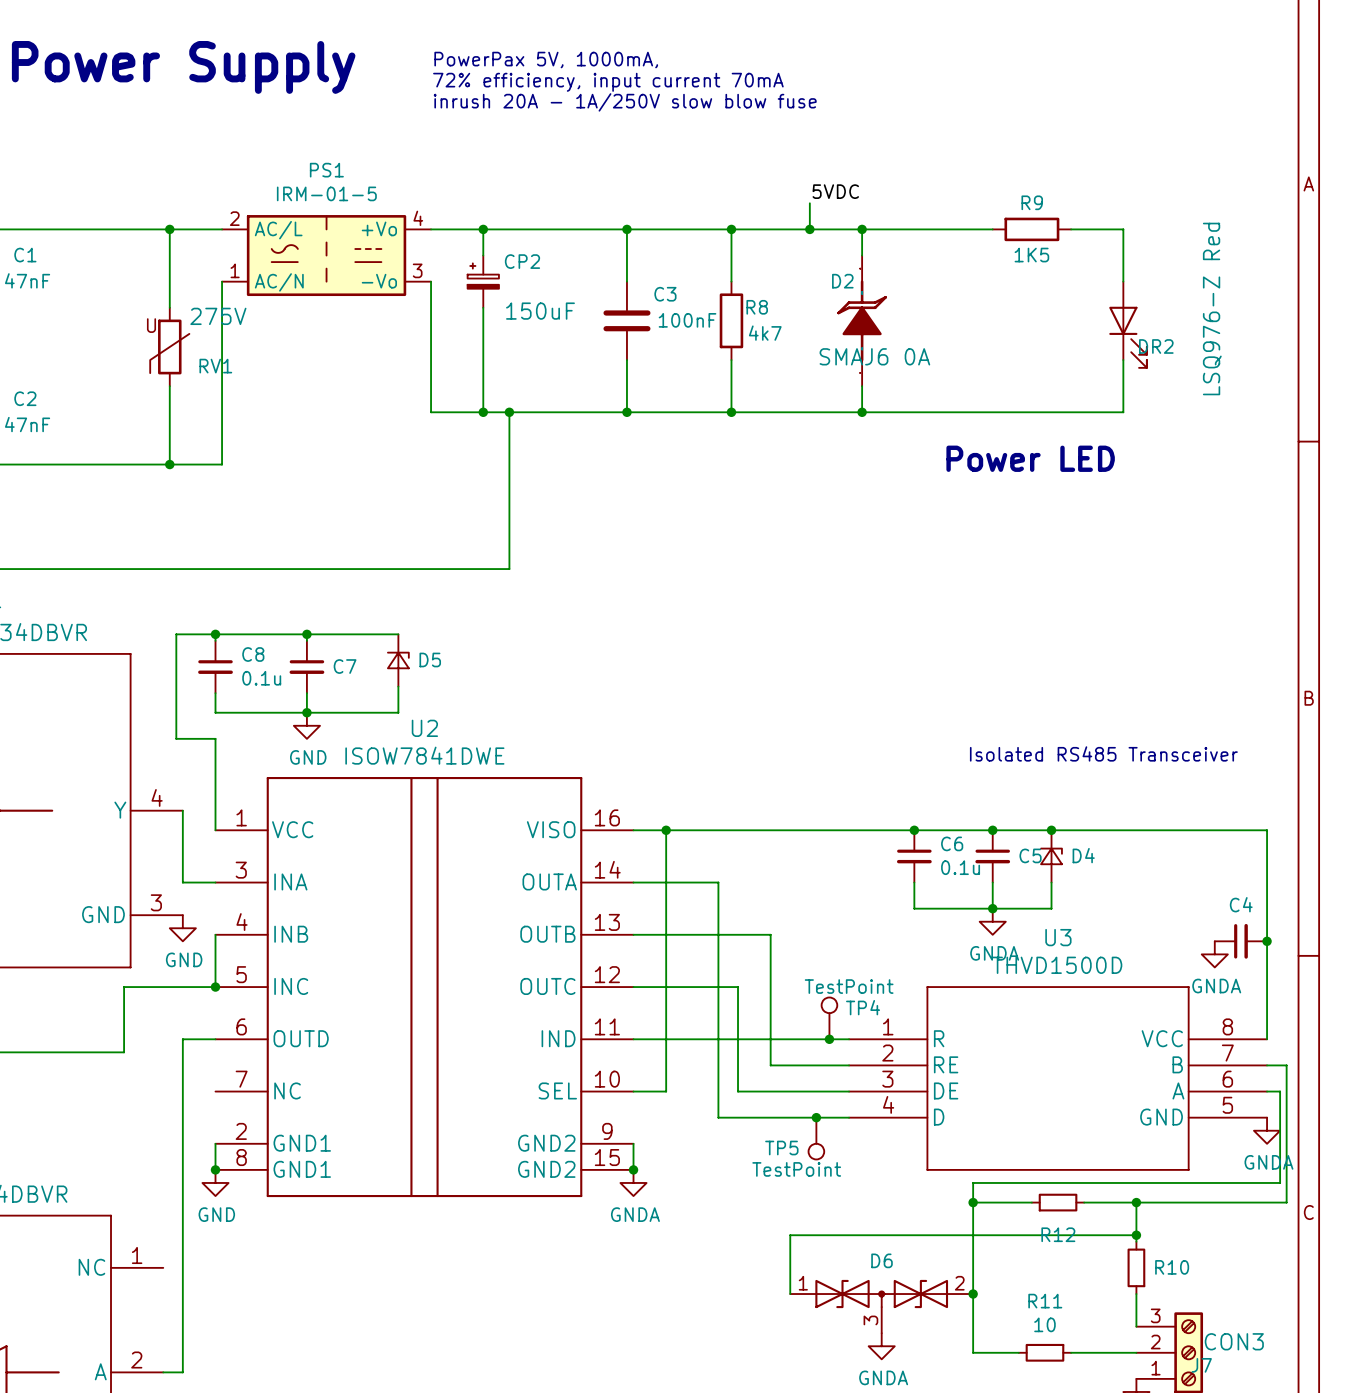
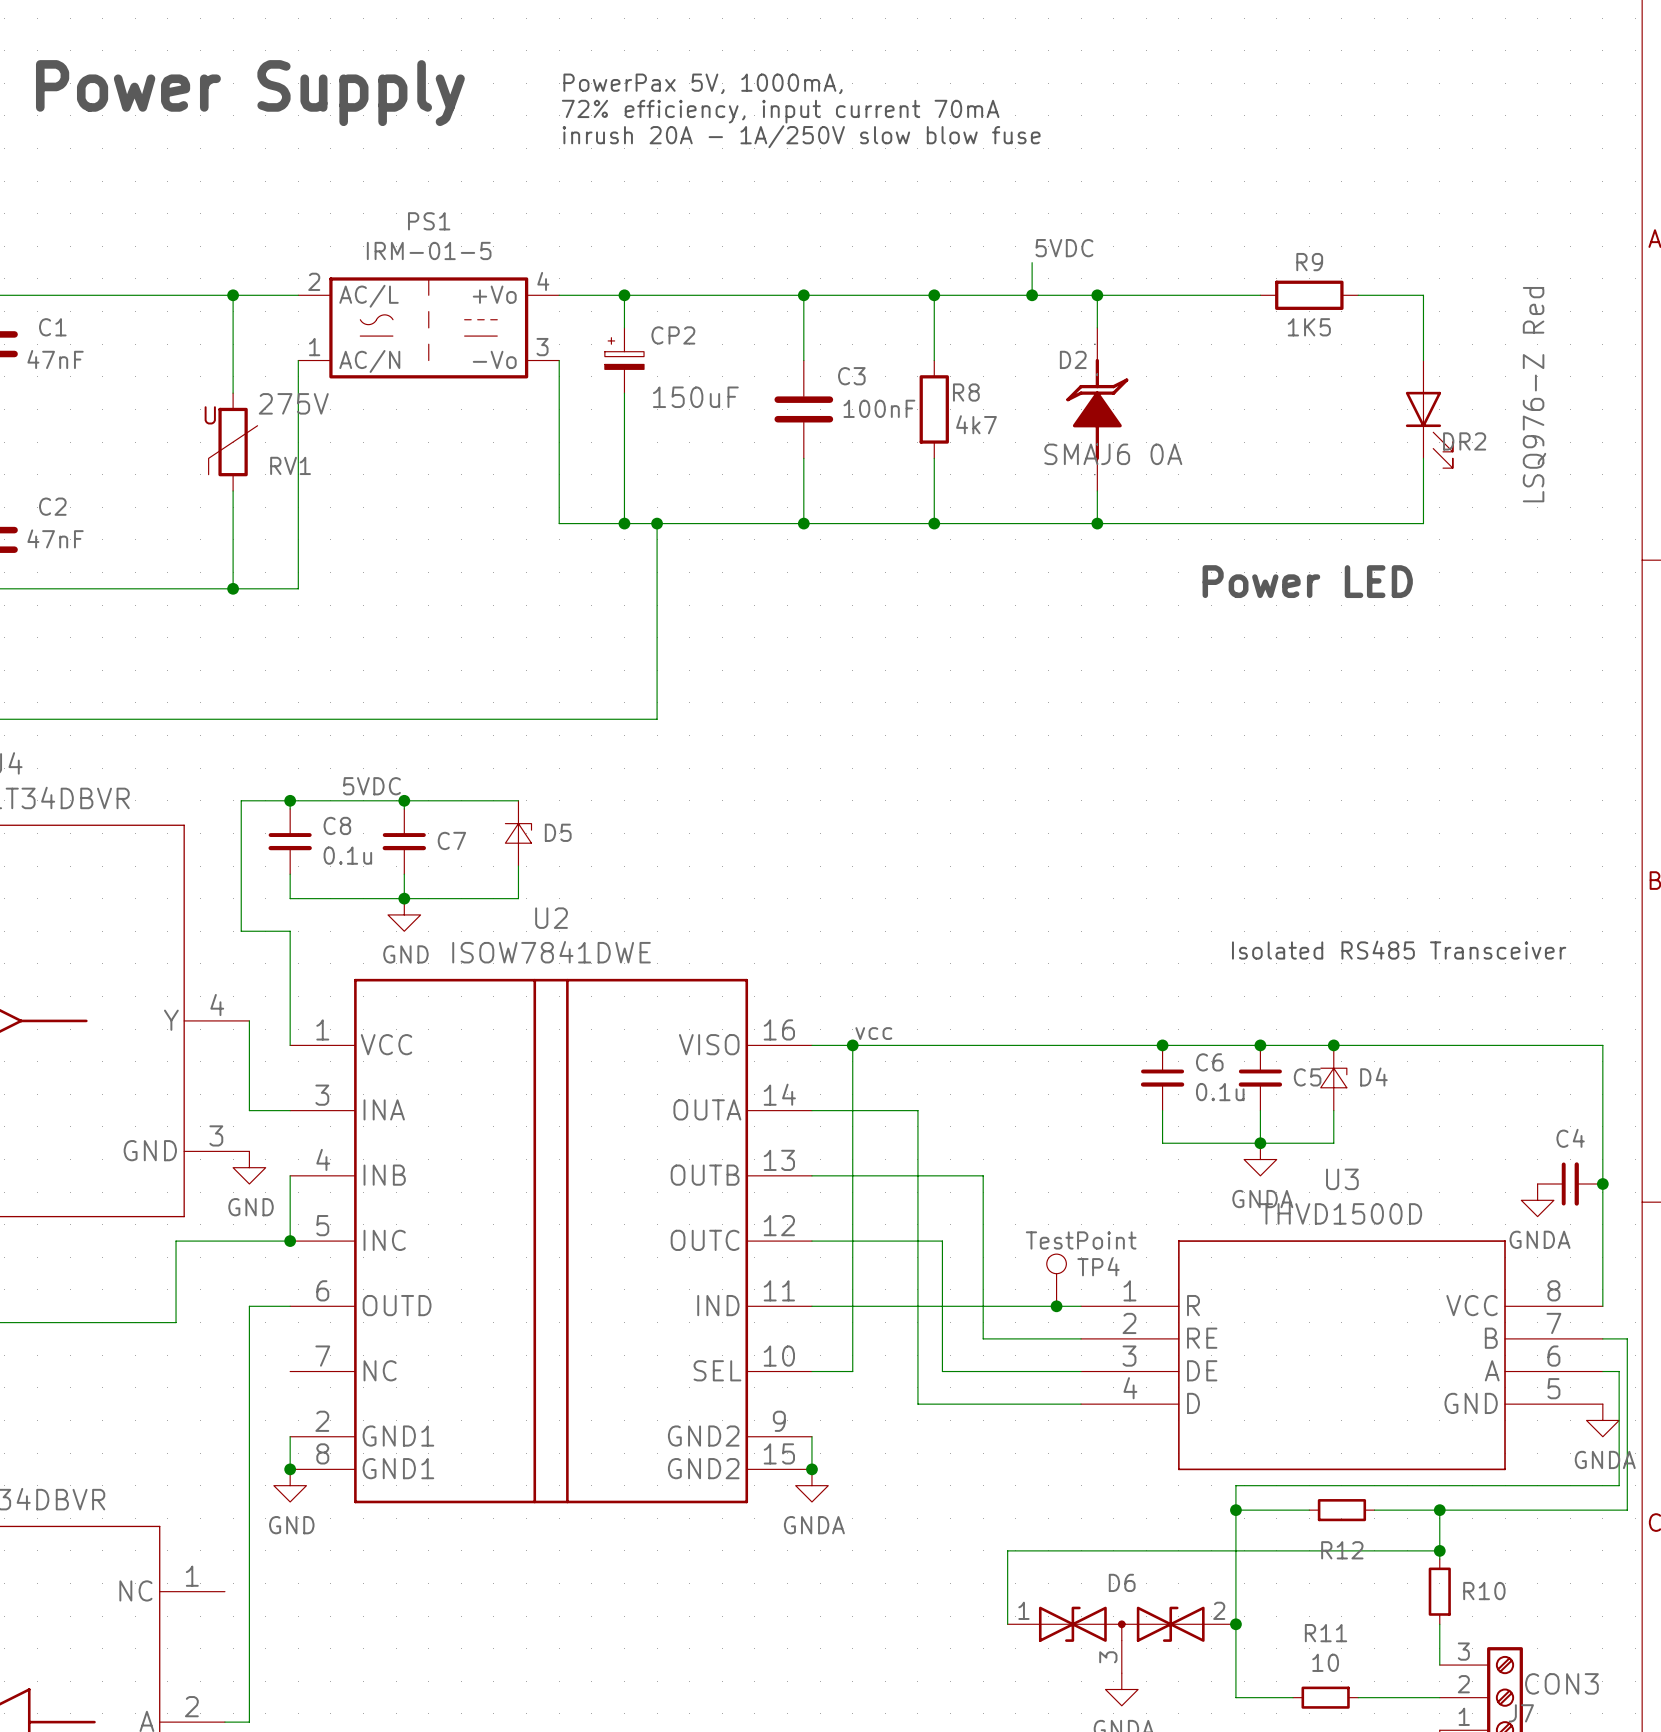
label: none -> 5VDC (371, 786)
label: none -> vcc (873, 1033)
junction: (816, 1117) -> none
TP5: TestPoint (816, 1138) -> none

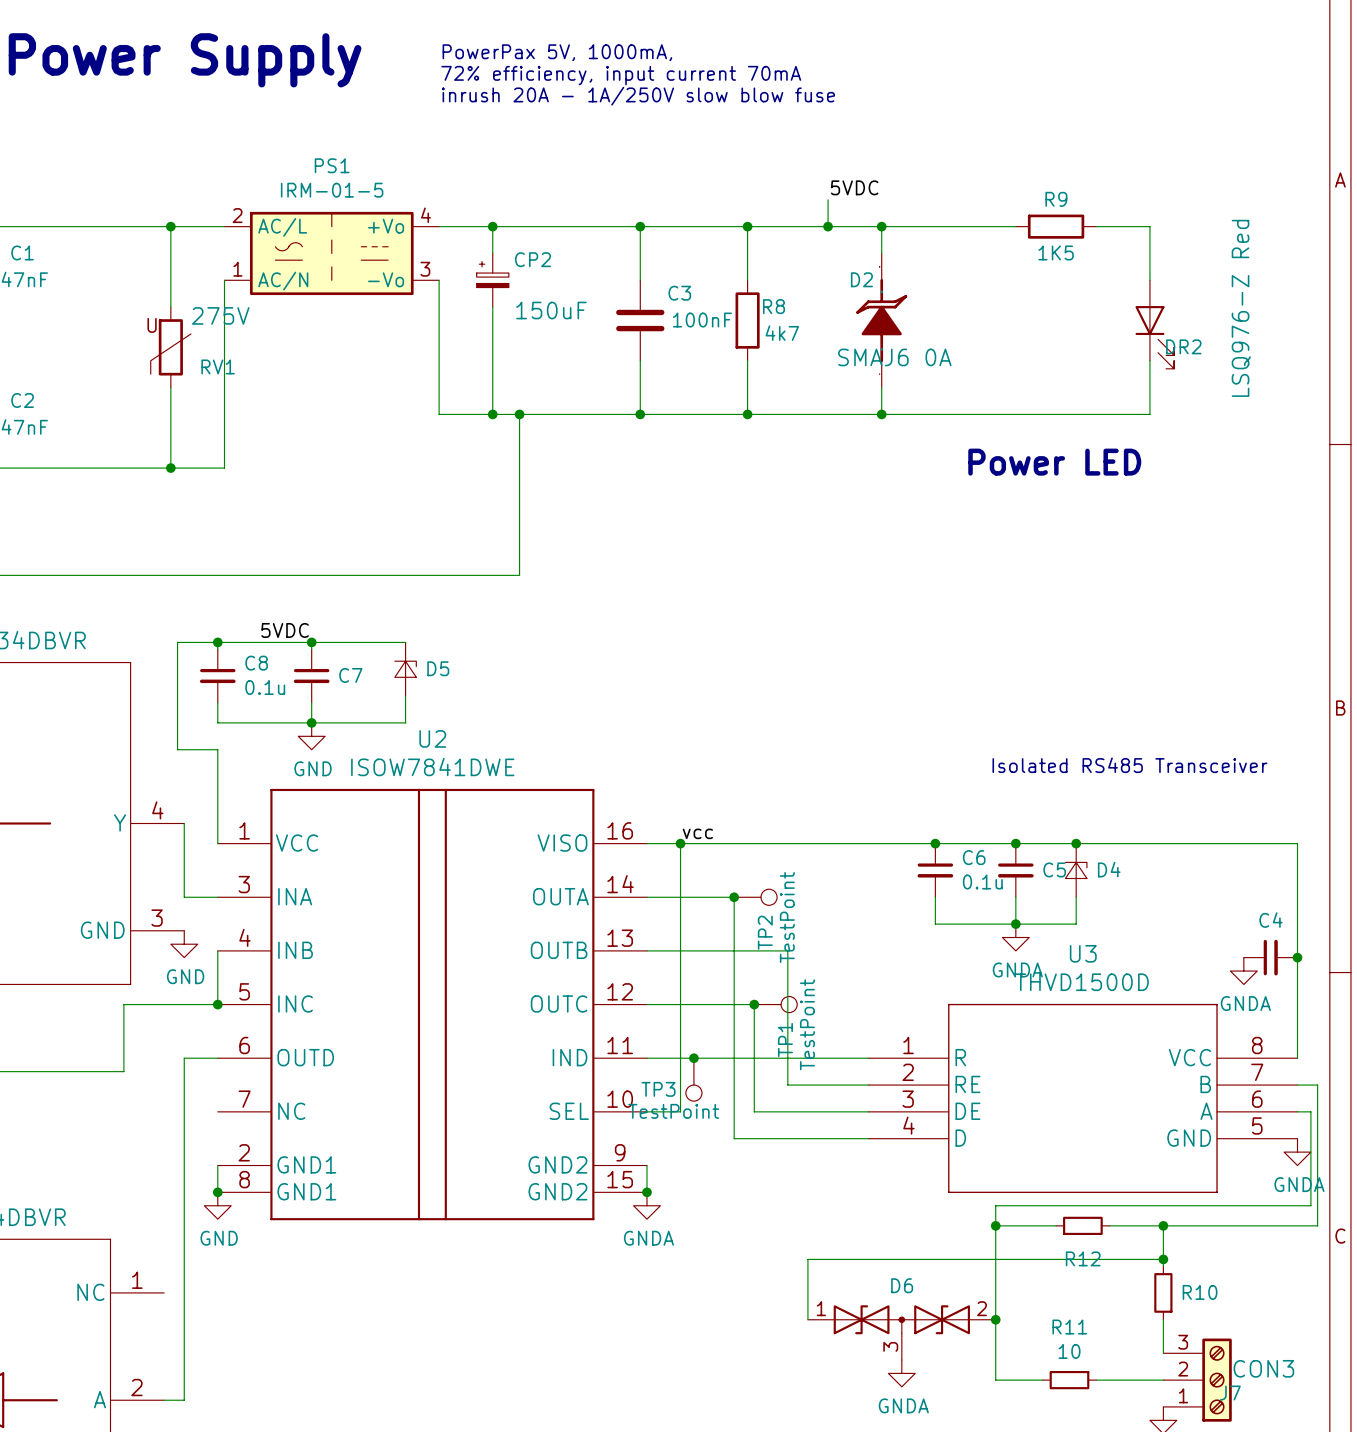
junction: none -> (734, 897)
TP2: none -> TestPoint (755, 897)
junction: none -> (754, 1004)
TP1: none -> TestPoint (775, 1004)
TP4: TestPoint (1056, 1280) -> none
junction: none -> (693, 1058)
junction: (1056, 1306) -> none
TP3: none -> TestPoint (693, 1079)

